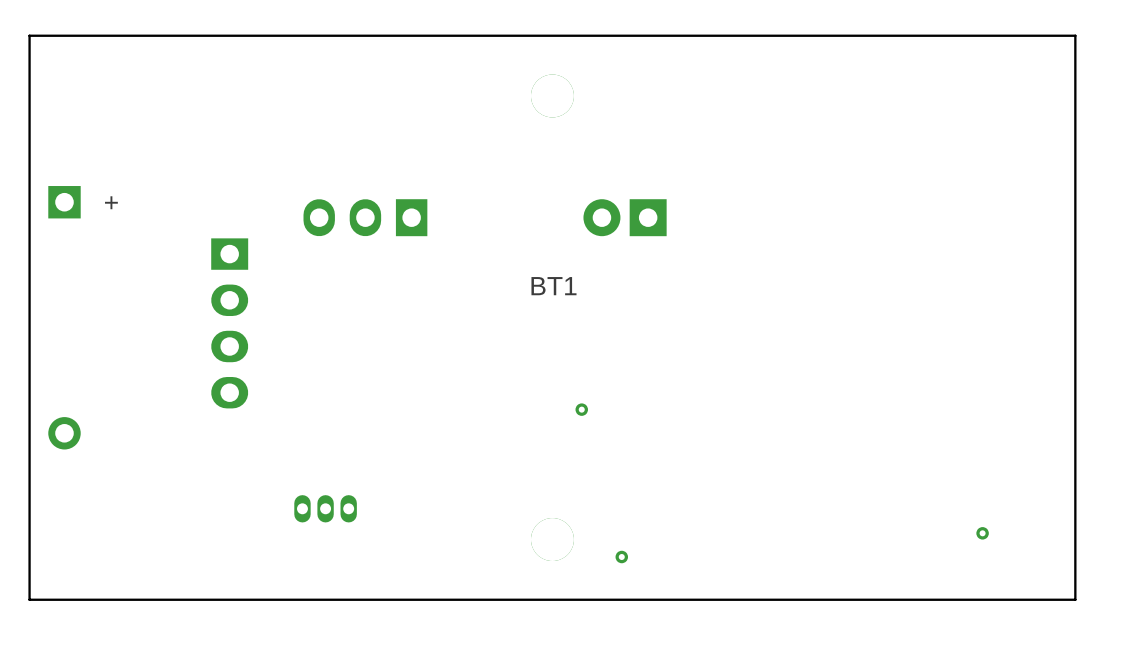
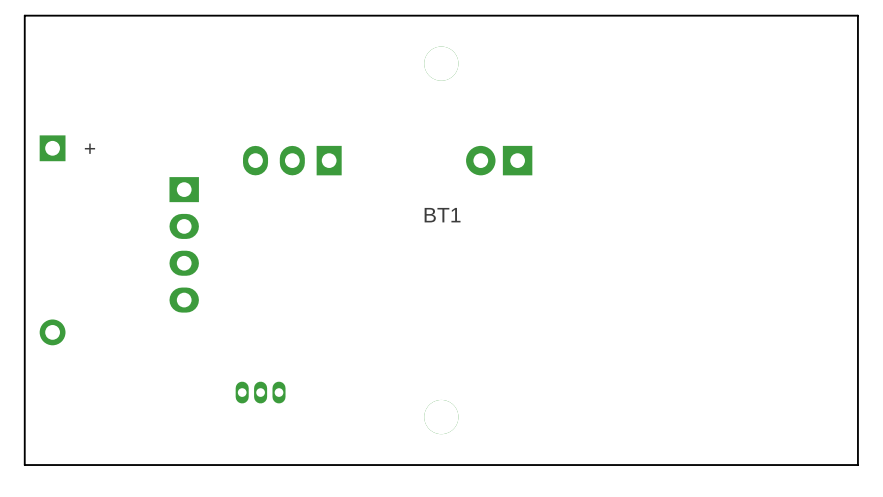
via: (581, 409) -> none
via: (982, 533) -> none
via: (621, 557) -> none

